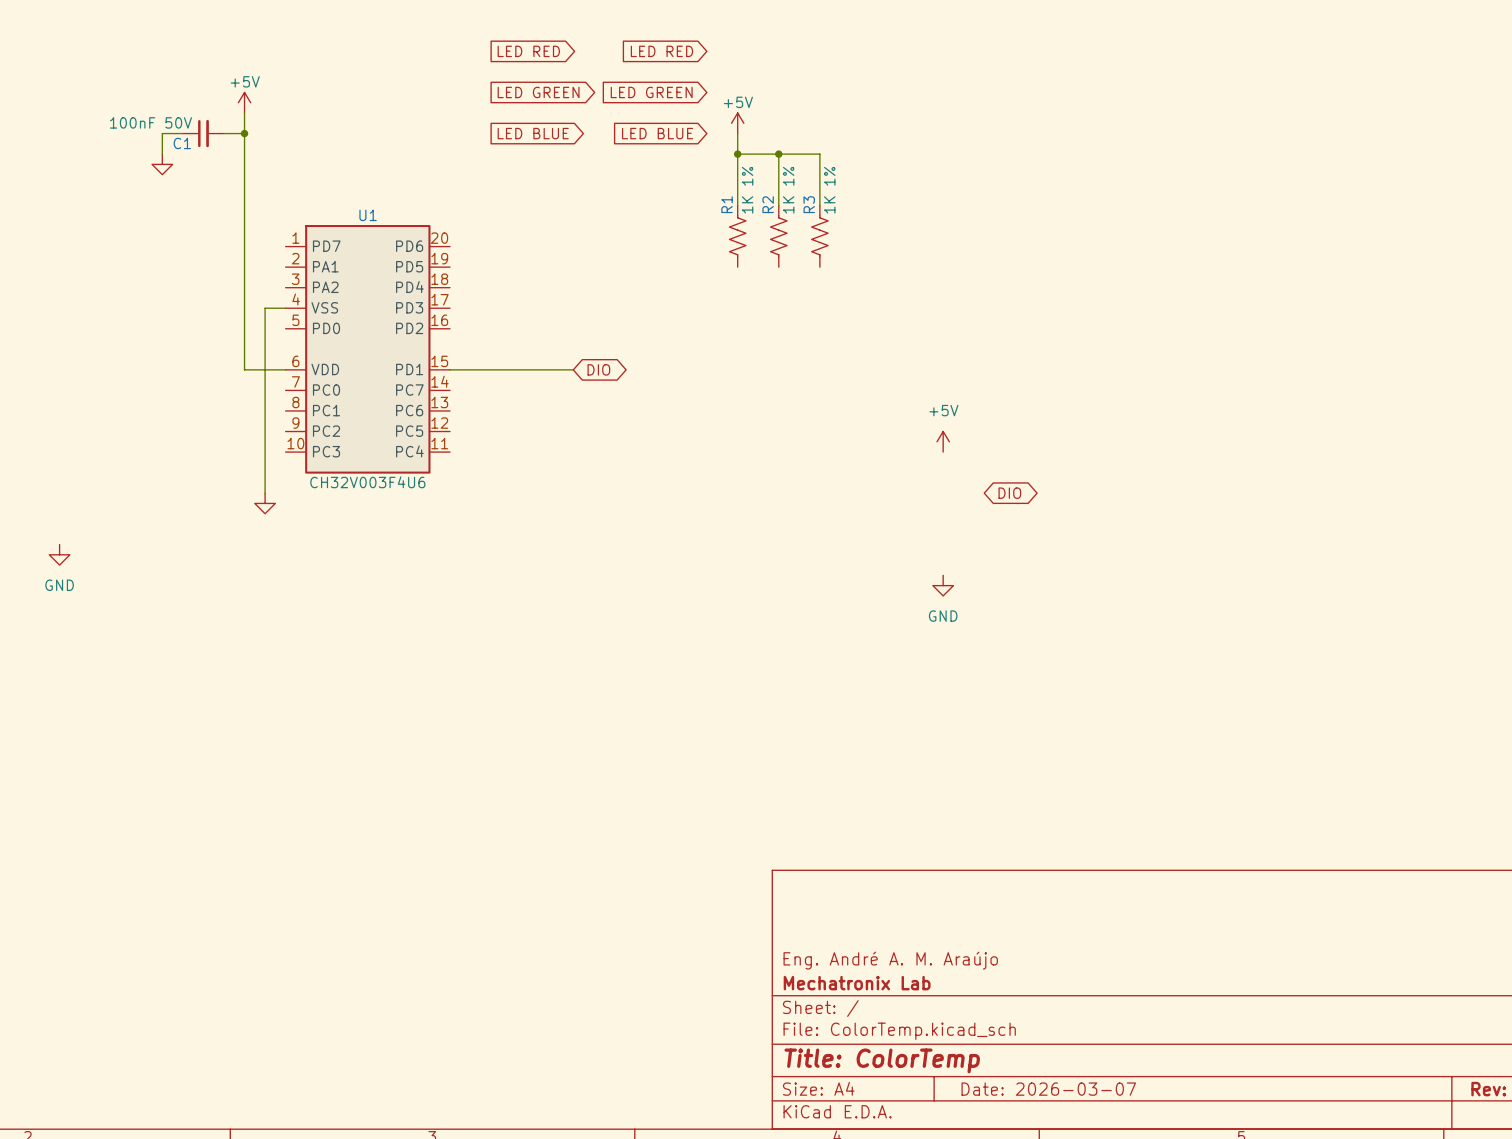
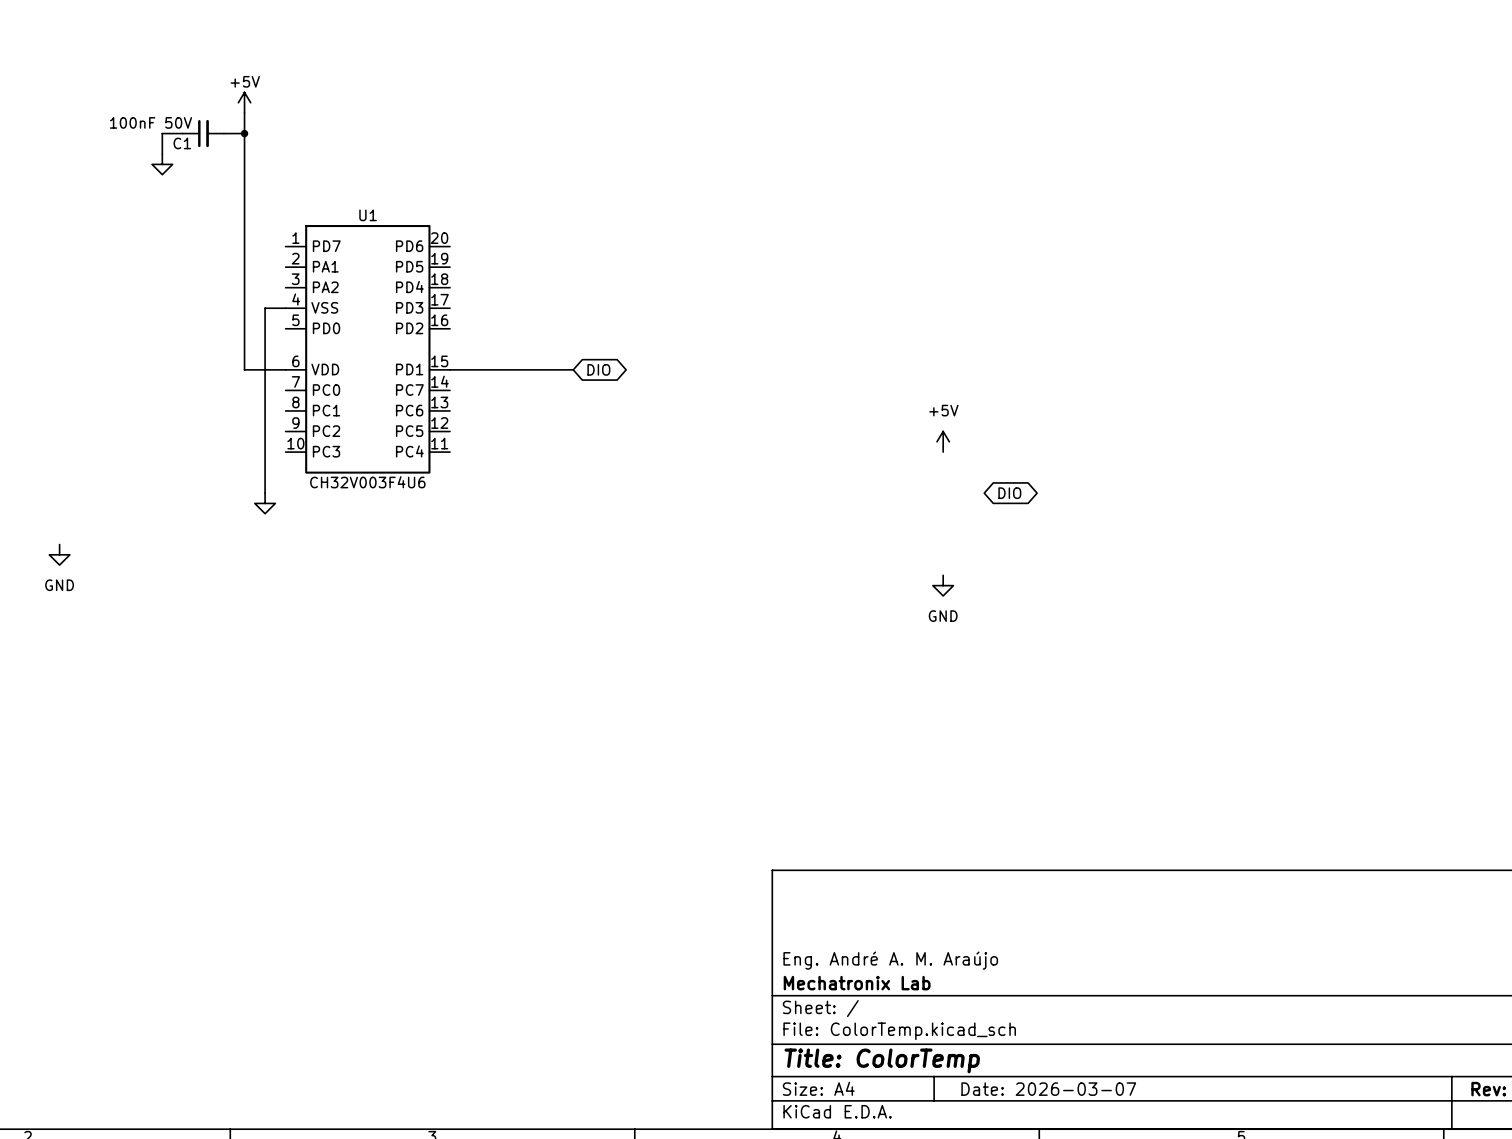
global label: LED RED (528, 51) -> none
global label: LED RED (661, 51) -> none
global label: LED GREEN (538, 92) -> none
global label: LED GREEN (651, 92) -> none
power symbol: +5V (737, 123) -> none
global label: LED BLUE (533, 133) -> none
global label: LED BLUE (657, 133) -> none
wire: (737, 133) (737, 205) -> none
wire: (737, 154) (819, 154) (819, 205) -> none
junction: (737, 154) -> none
wire: (778, 154) (778, 205) -> none
junction: (778, 154) -> none
R1: 1K 1% (737, 236) -> none
R2: 1K 1% (778, 236) -> none
R3: 1K 1% (819, 236) -> none

